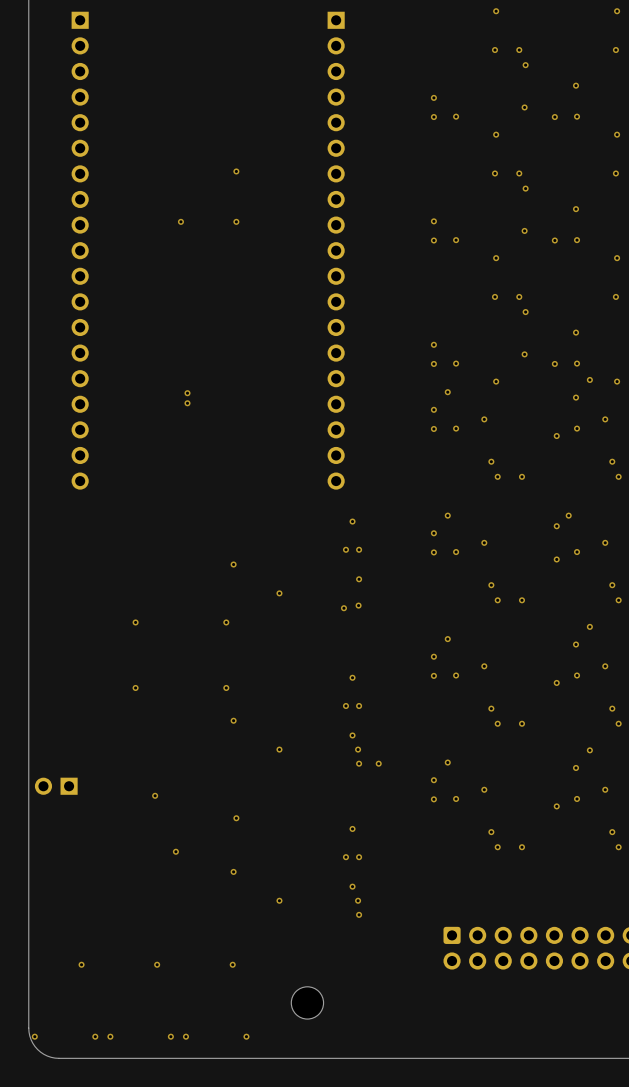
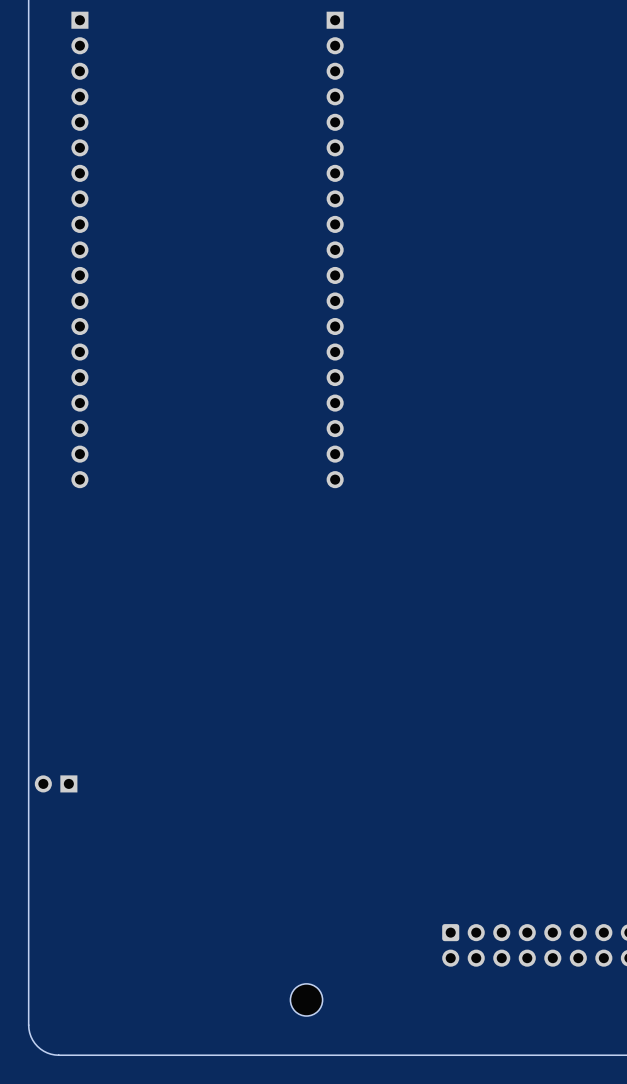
via: (496, 11) -> none
via: (617, 11) -> none
via: (494, 50) -> none
via: (519, 50) -> none
via: (615, 50) -> none
via: (525, 65) -> none
via: (576, 85) -> none
via: (433, 97) -> none
via: (524, 107) -> none
via: (456, 116) -> none
via: (577, 116) -> none
via: (433, 117) -> none
via: (554, 117) -> none
via: (496, 134) -> none
via: (617, 134) -> none
via: (236, 171) -> none
via: (494, 173) -> none
via: (519, 173) -> none
via: (615, 173) -> none
via: (525, 188) -> none
via: (576, 209) -> none
via: (180, 221) -> none
via: (236, 221) -> none
via: (433, 221) -> none
via: (524, 230) -> none
via: (433, 240) -> none
via: (456, 240) -> none
via: (554, 240) -> none
via: (577, 240) -> none
via: (496, 258) -> none
via: (617, 258) -> none
via: (494, 296) -> none
via: (519, 296) -> none
via: (615, 296) -> none
via: (525, 312) -> none
via: (576, 332) -> none
via: (433, 344) -> none
via: (524, 354) -> none
via: (433, 363) -> none
via: (456, 363) -> none
via: (554, 363) -> none
via: (577, 363) -> none
via: (589, 379) -> none
via: (496, 381) -> none
via: (617, 381) -> none
via: (447, 392) -> none
via: (187, 393) -> none
via: (576, 397) -> none
via: (187, 403) -> none
via: (433, 409) -> none
via: (484, 419) -> none
via: (605, 419) -> none
via: (433, 428) -> none
via: (456, 428) -> none
via: (577, 428) -> none
via: (556, 436) -> none
via: (491, 461) -> none
via: (612, 461) -> none
via: (497, 476) -> none
via: (522, 476) -> none
via: (618, 476) -> none
via: (447, 515) -> none
via: (568, 515) -> none
via: (352, 521) -> none
via: (556, 526) -> none
via: (433, 533) -> none
via: (484, 542) -> none
via: (605, 542) -> none
via: (345, 549) -> none
via: (359, 549) -> none
via: (433, 552) -> none
via: (456, 552) -> none
via: (577, 552) -> none
via: (556, 559) -> none
via: (233, 564) -> none
via: (359, 579) -> none
via: (491, 585) -> none
via: (612, 585) -> none
via: (279, 593) -> none
via: (497, 600) -> none
via: (522, 600) -> none
via: (618, 600) -> none
via: (358, 605) -> none
via: (343, 608) -> none
via: (135, 622) -> none
via: (226, 622) -> none
via: (589, 626) -> none
via: (447, 639) -> none
via: (576, 644) -> none
via: (433, 656) -> none
via: (484, 666) -> none
via: (605, 666) -> none
via: (433, 675) -> none
via: (456, 675) -> none
via: (577, 675) -> none
via: (352, 677) -> none
via: (556, 682) -> none
via: (135, 687) -> none
via: (226, 687) -> none
via: (345, 705) -> none
via: (359, 705) -> none
via: (491, 708) -> none
via: (612, 708) -> none
via: (233, 720) -> none
via: (497, 723) -> none
via: (522, 723) -> none
via: (618, 723) -> none
via: (352, 735) -> none
via: (279, 749) -> none
via: (358, 749) -> none
via: (589, 750) -> none
via: (447, 762) -> none
via: (359, 763) -> none
via: (378, 763) -> none
via: (576, 767) -> none
via: (433, 780) -> none
via: (484, 789) -> none
via: (605, 789) -> none
via: (155, 795) -> none
via: (456, 798) -> none
via: (577, 798) -> none
via: (433, 799) -> none
via: (556, 806) -> none
via: (236, 818) -> none
via: (352, 828) -> none
via: (491, 832) -> none
via: (612, 832) -> none
via: (497, 847) -> none
via: (522, 847) -> none
via: (618, 847) -> none
via: (175, 851) -> none
via: (345, 857) -> none
via: (359, 857) -> none
via: (233, 871) -> none
via: (352, 886) -> none
via: (279, 900) -> none
via: (358, 900) -> none
via: (359, 914) -> none
via: (81, 964) -> none
via: (157, 964) -> none
via: (232, 964) -> none
via: (34, 1036) -> none
via: (95, 1036) -> none
via: (110, 1036) -> none
via: (170, 1036) -> none
via: (185, 1036) -> none
via: (246, 1036) -> none

